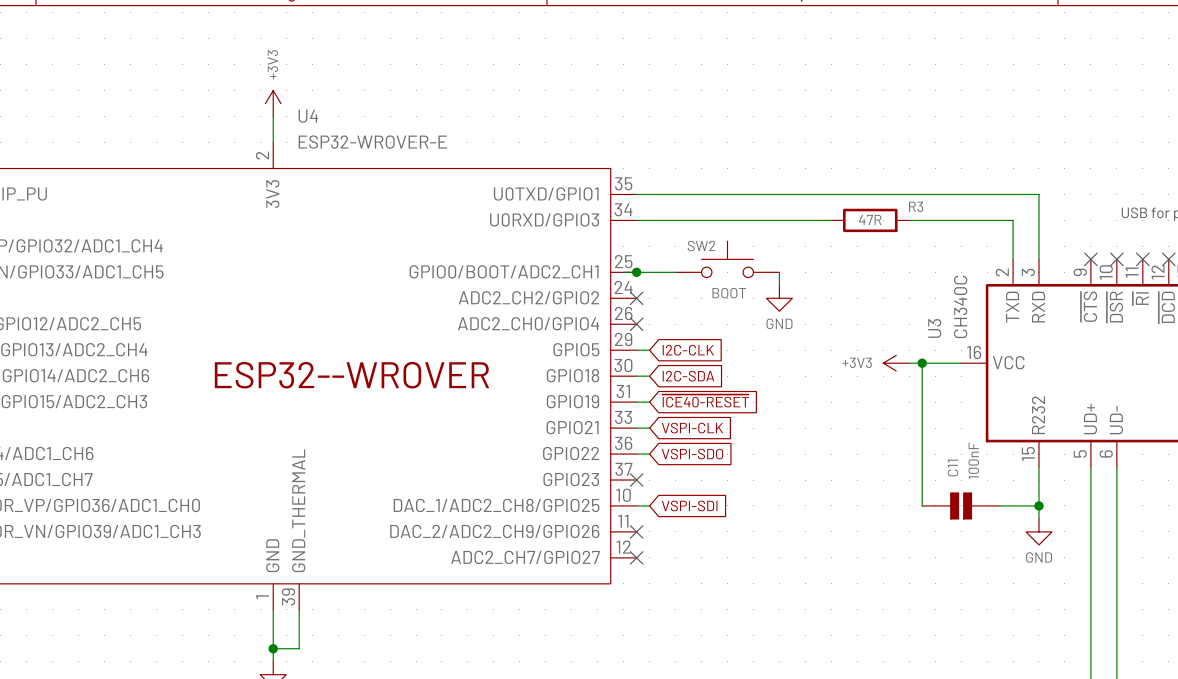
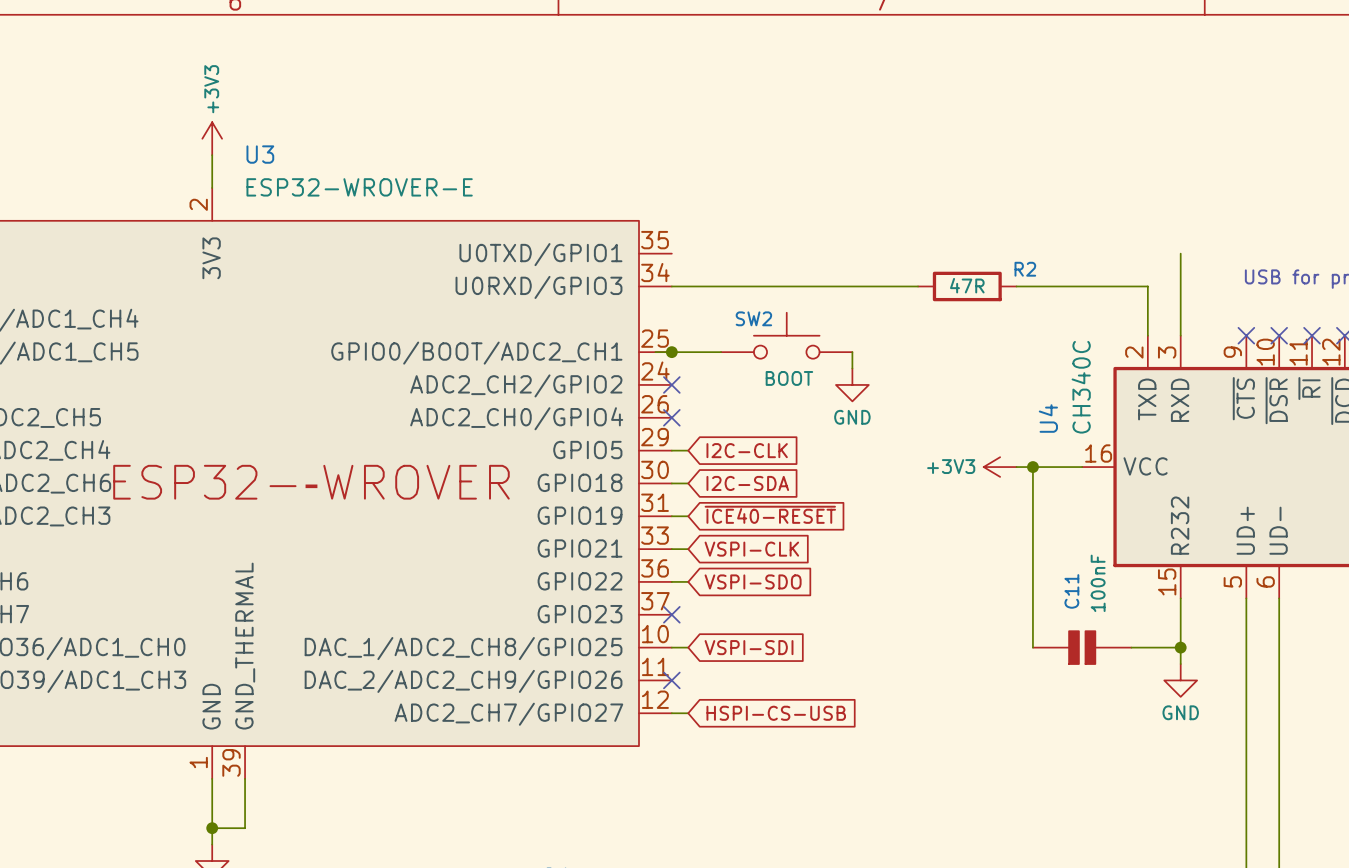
U4 name: U4 (308, 116) -> U3 (260, 154)
wire: (636, 194) (1038, 194) -> none
R3 name: R3 (916, 206) -> R2 (1025, 269)
U3 name: U3 (934, 328) -> U4 (1048, 418)
wire: none -> (671, 713) (688, 713)
no-connect mark: (636, 557) -> none
global label: none -> HSPI-CS-USB (776, 713)

